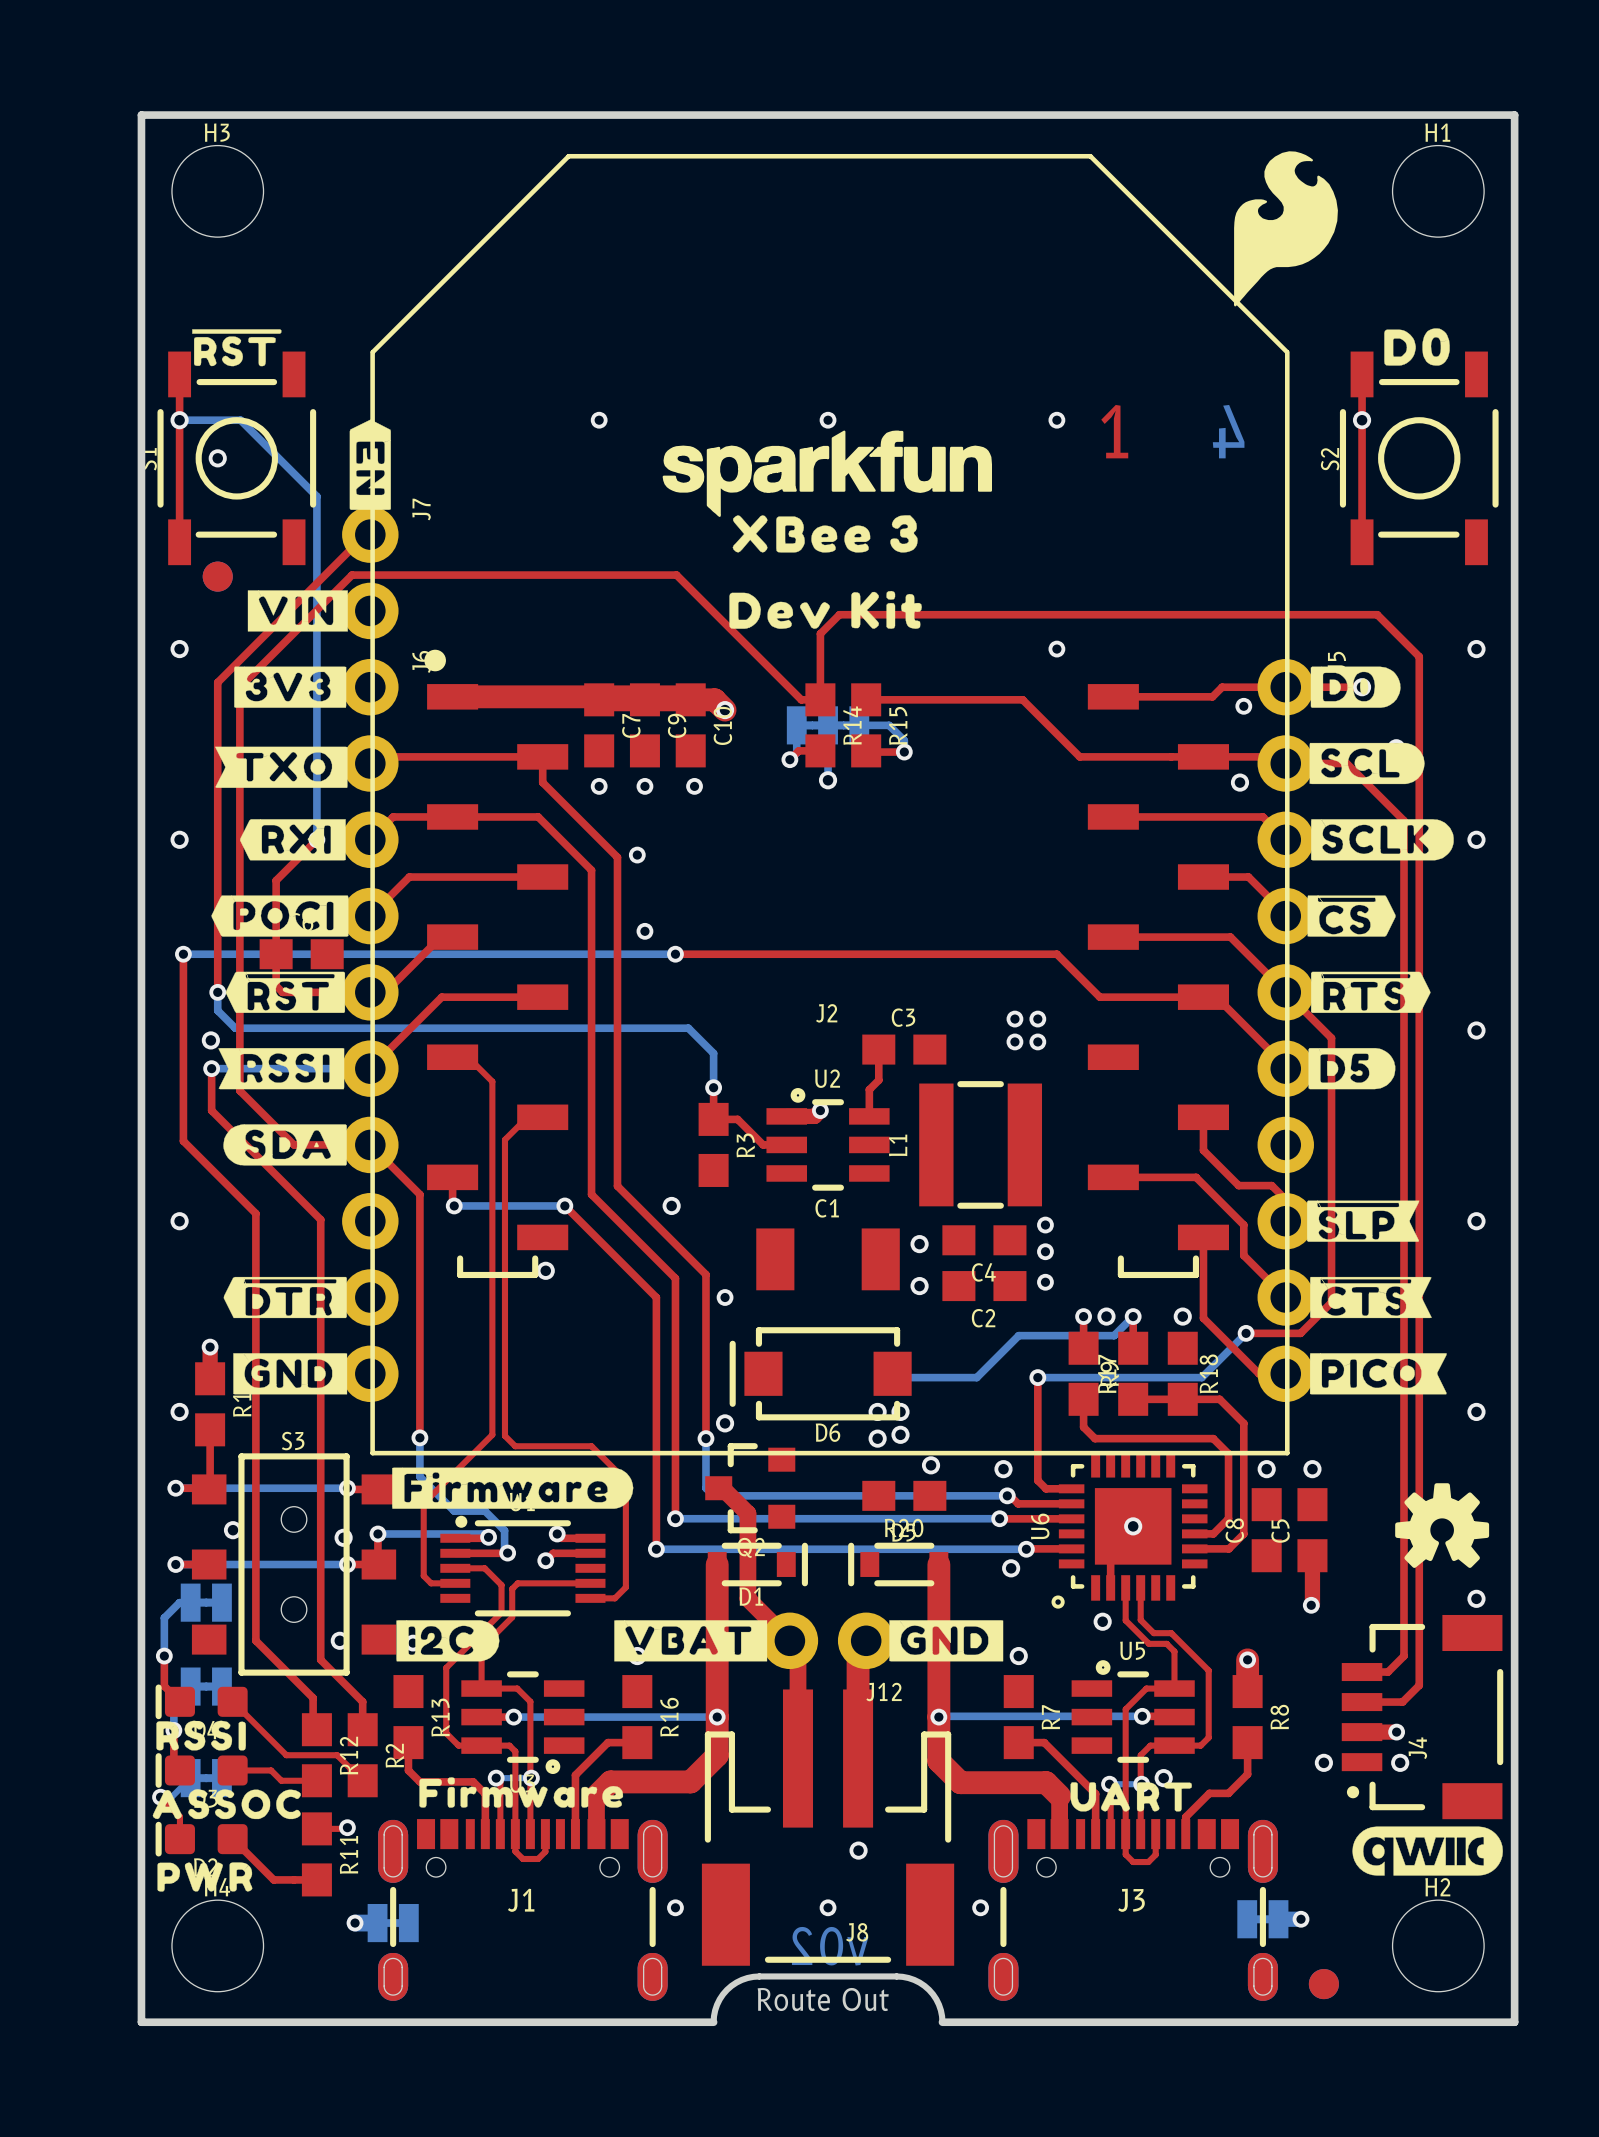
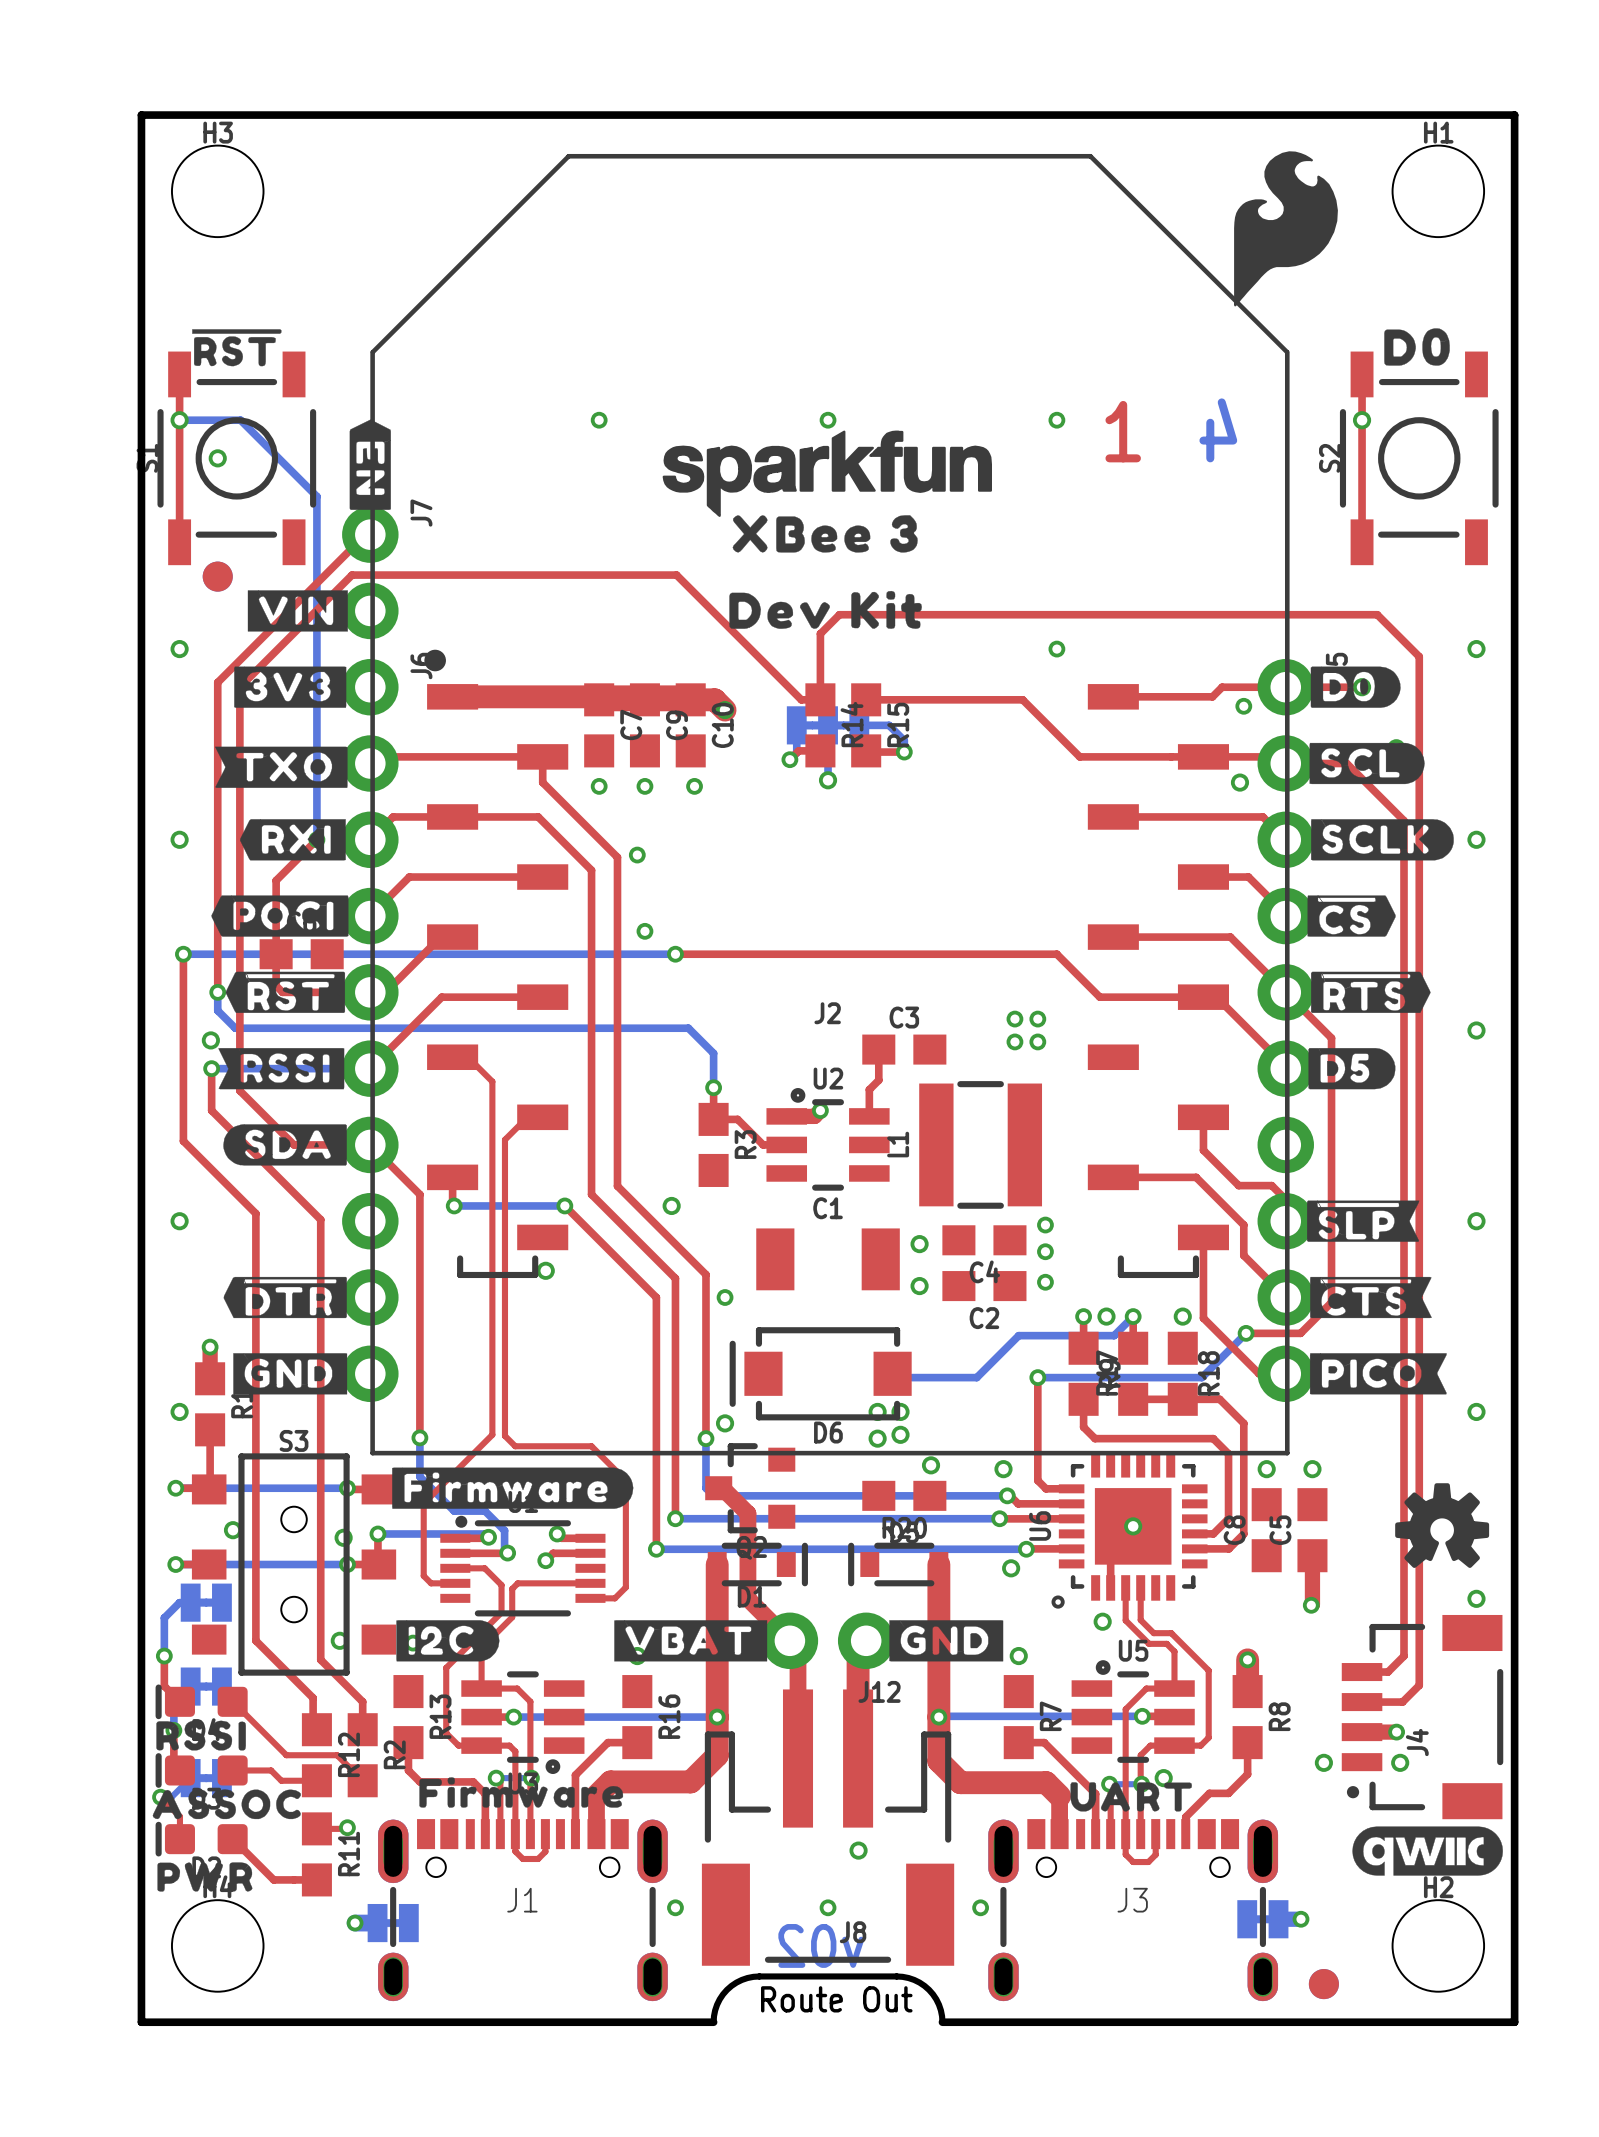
J1 footprint: [378, 1819, 668, 2001] -> [378, 1819, 668, 2002]
J3 footprint: [988, 1819, 1278, 2001] -> [988, 1819, 1279, 2002]

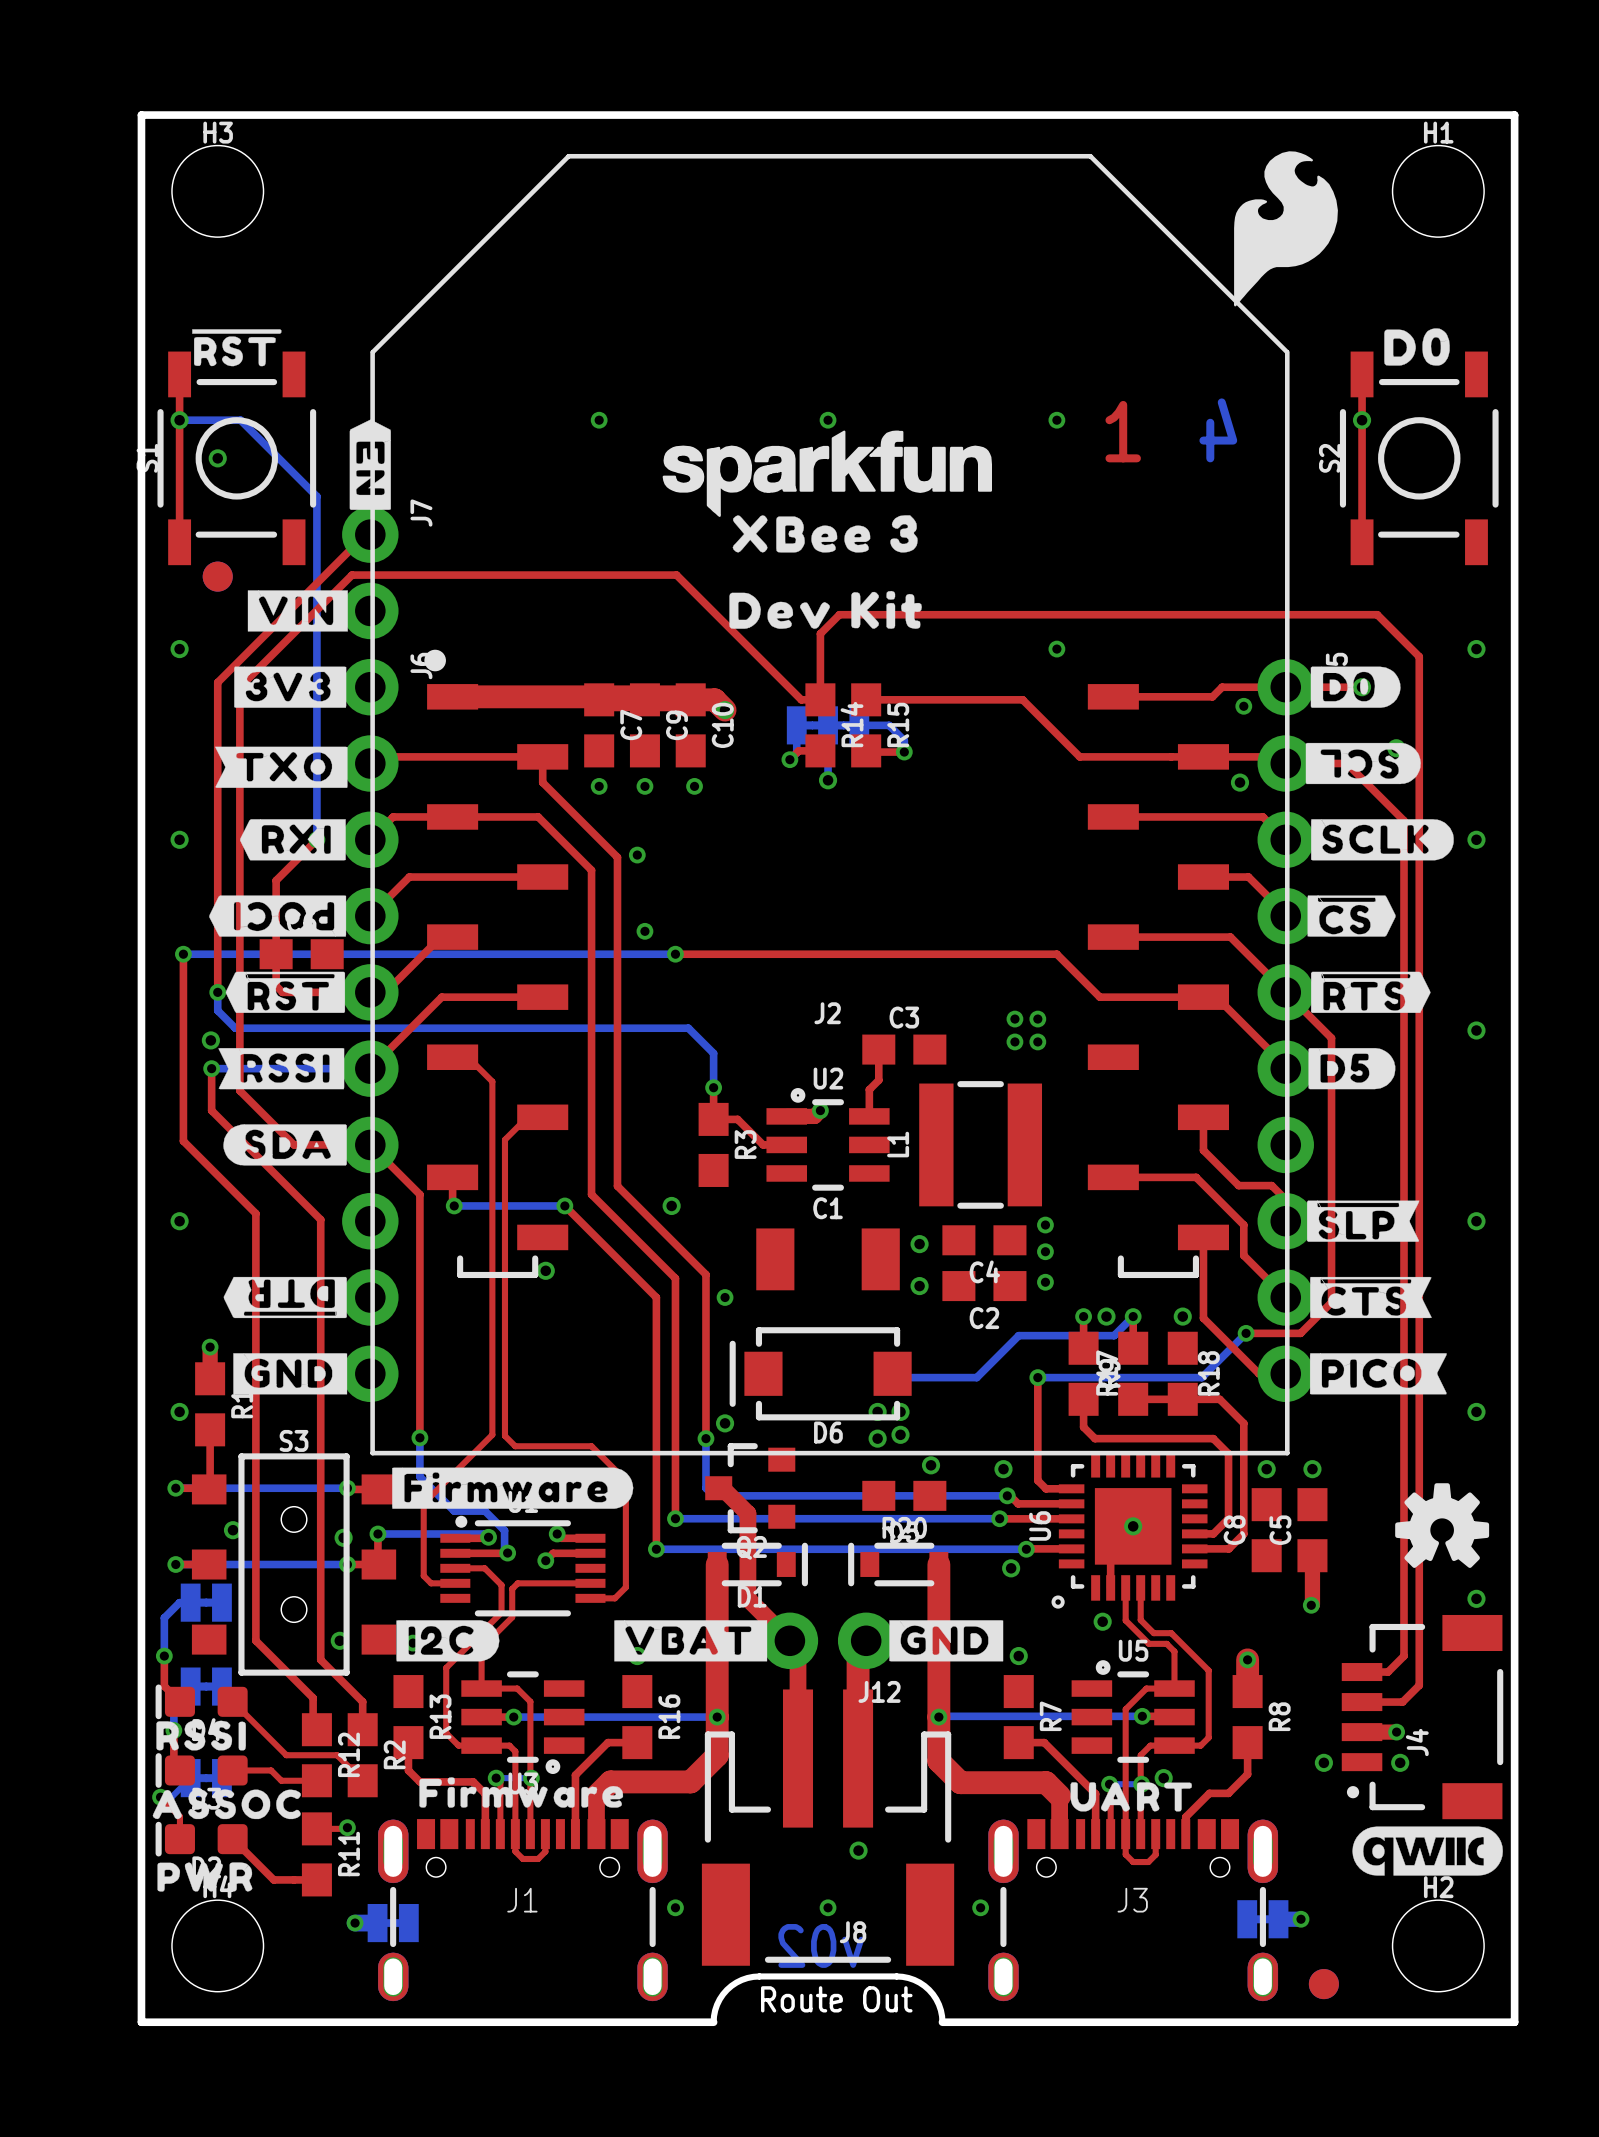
drawing shape: [1309, 742, 1425, 785] -> [1305, 742, 1421, 785]
drawing shape: [211, 895, 349, 937] -> [209, 895, 347, 937]
drawing shape: [223, 1276, 347, 1319] -> [223, 1276, 347, 1319]

